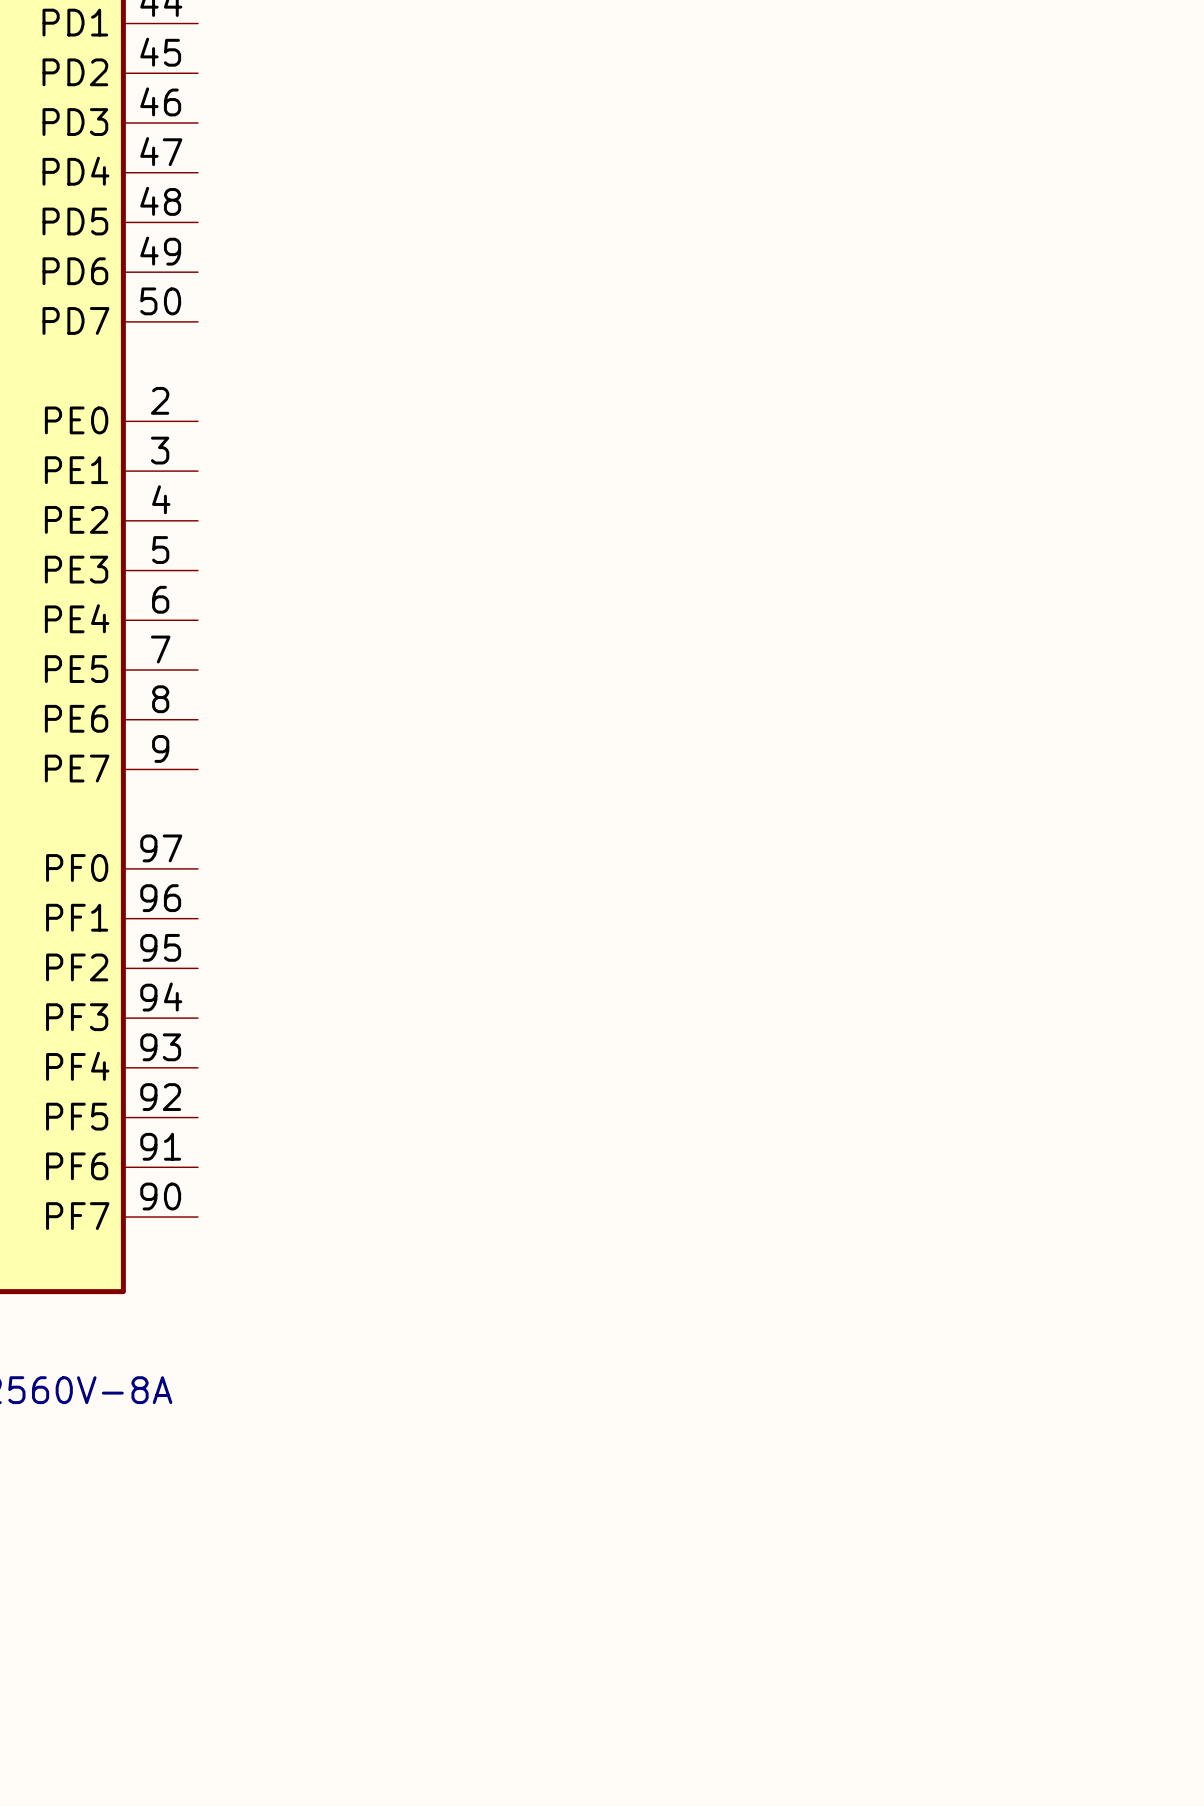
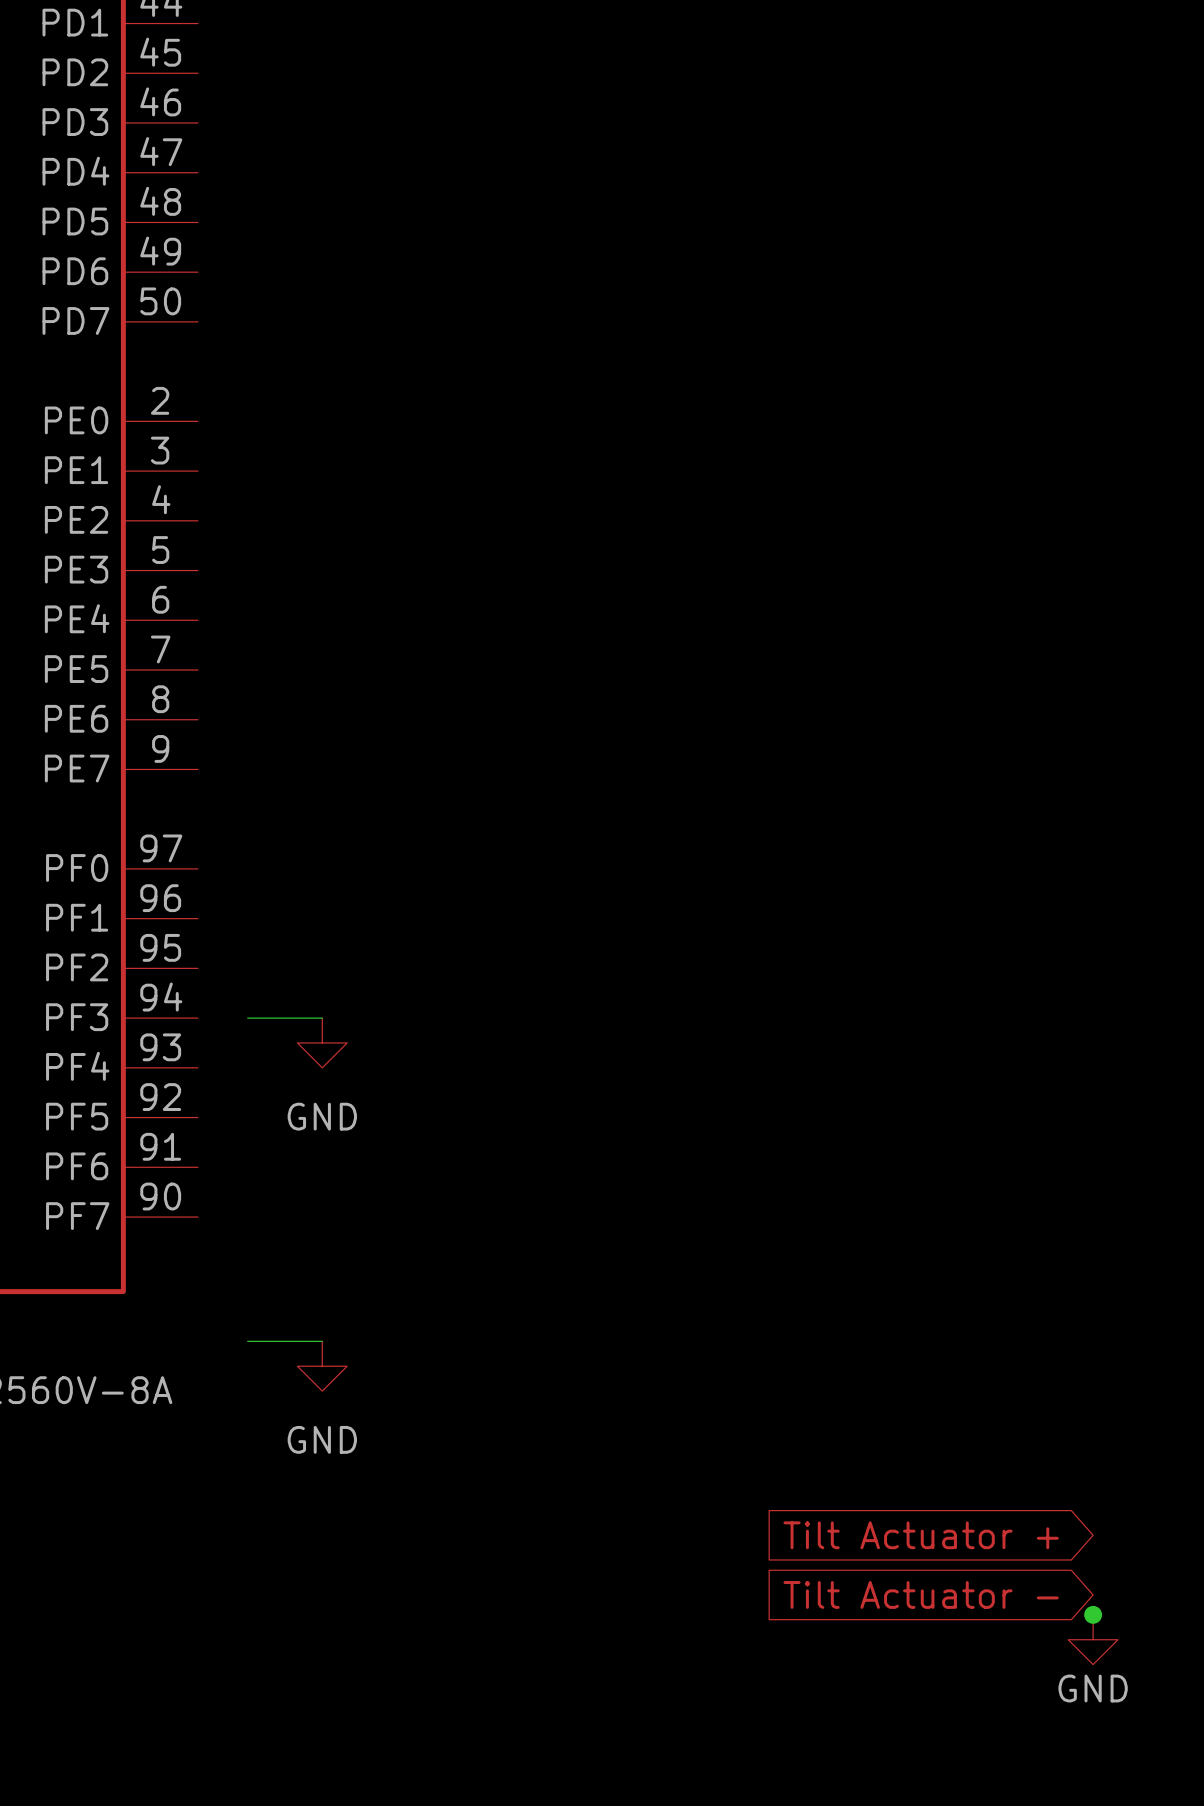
wire: none -> (247, 1018) (322, 1018)
power symbol: none -> GND (322, 1042)
wire: none -> (247, 1341) (322, 1341)
power symbol: none -> GND (322, 1366)
global label: none -> Tilt Actuator + (921, 1535)
global label: none -> Tilt Actuator - (921, 1594)
junction: none -> (1093, 1614)
power symbol: none -> GND (1093, 1639)

